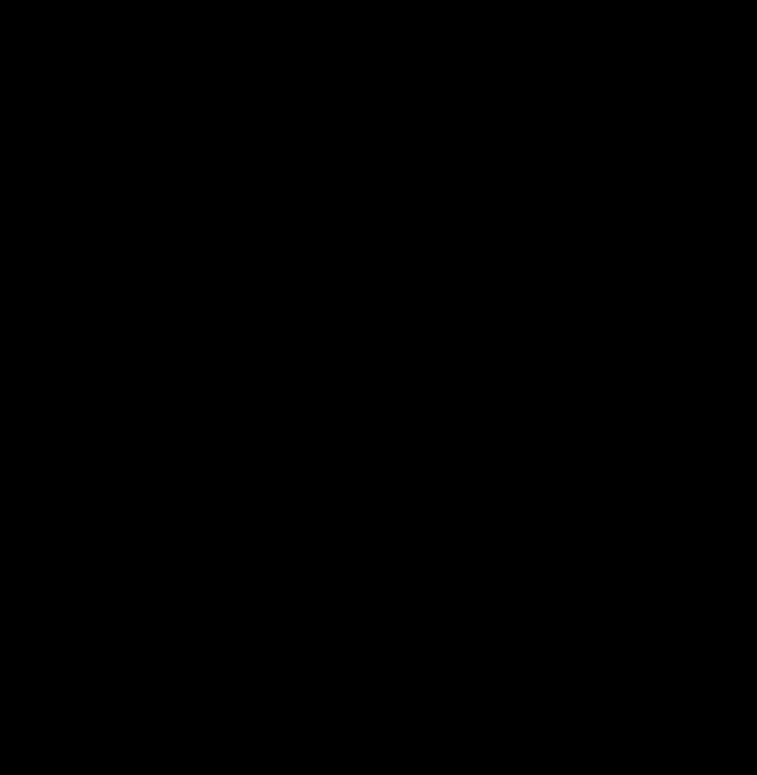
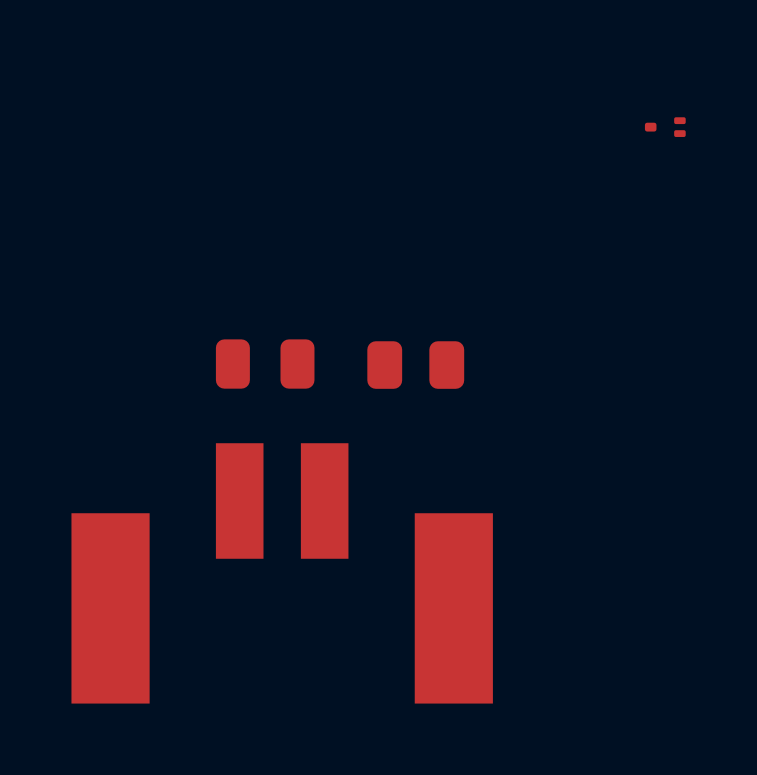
part: none -> (665, 127)
part: none -> (265, 364)
part: none -> (415, 365)
part: none -> (282, 573)

